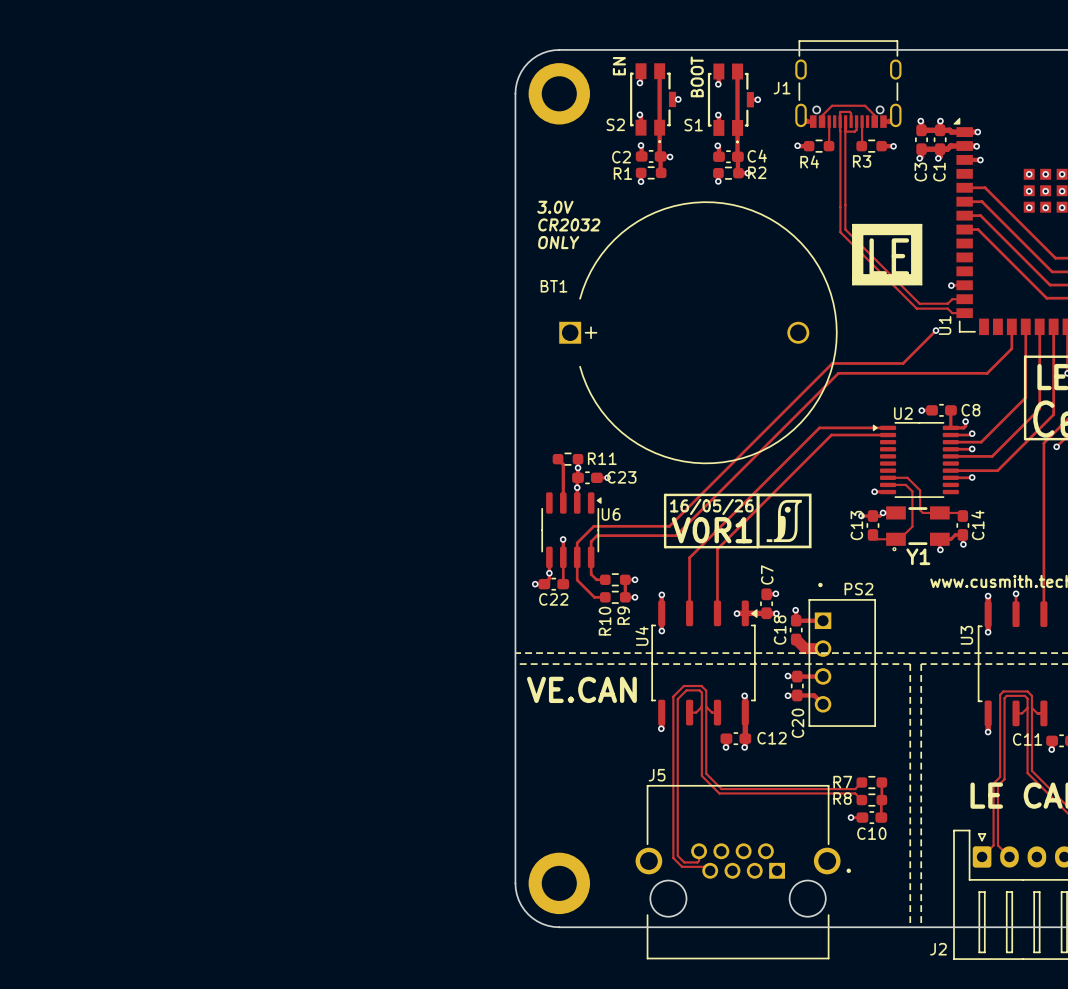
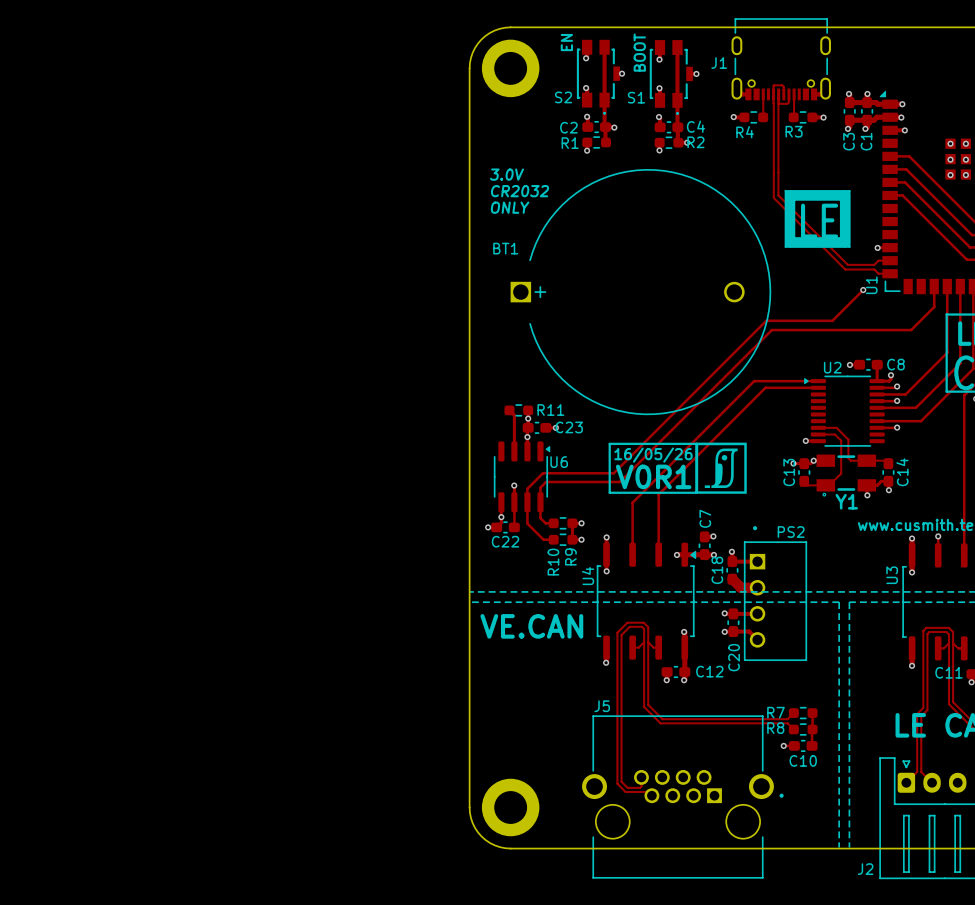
track: (822, 121) (822, 115) (832, 105) (865, 105) (874, 115) (874, 121) -> none

